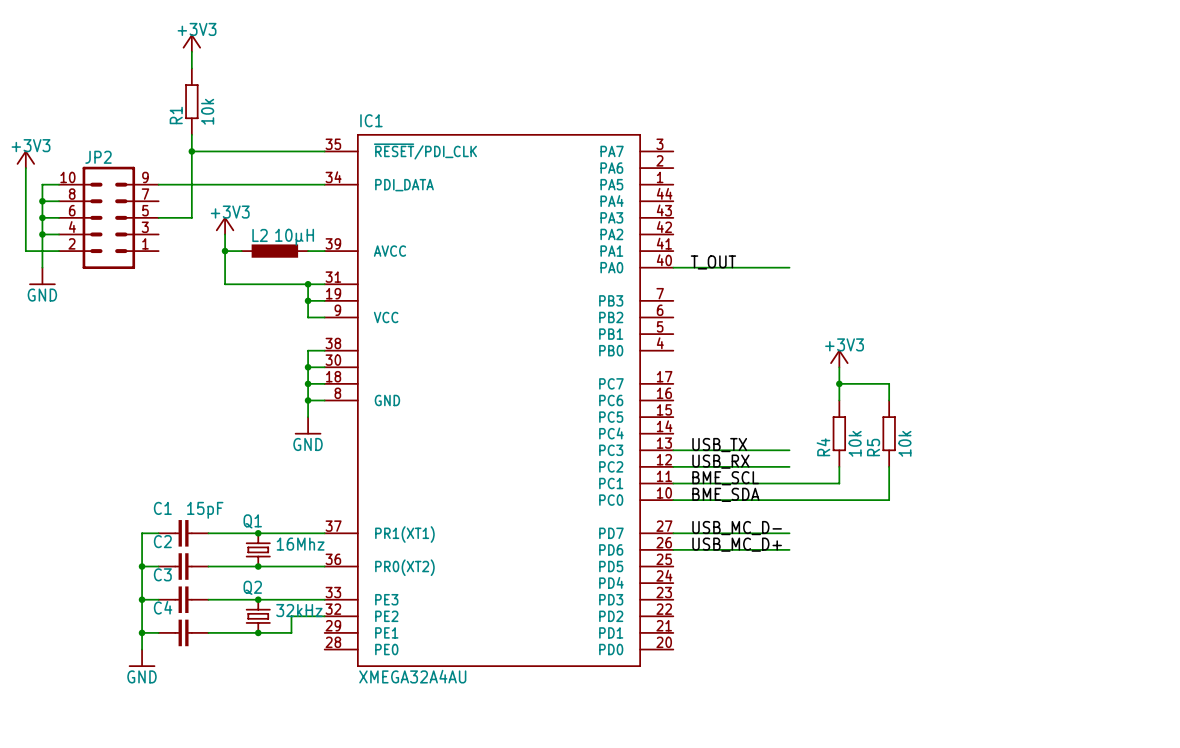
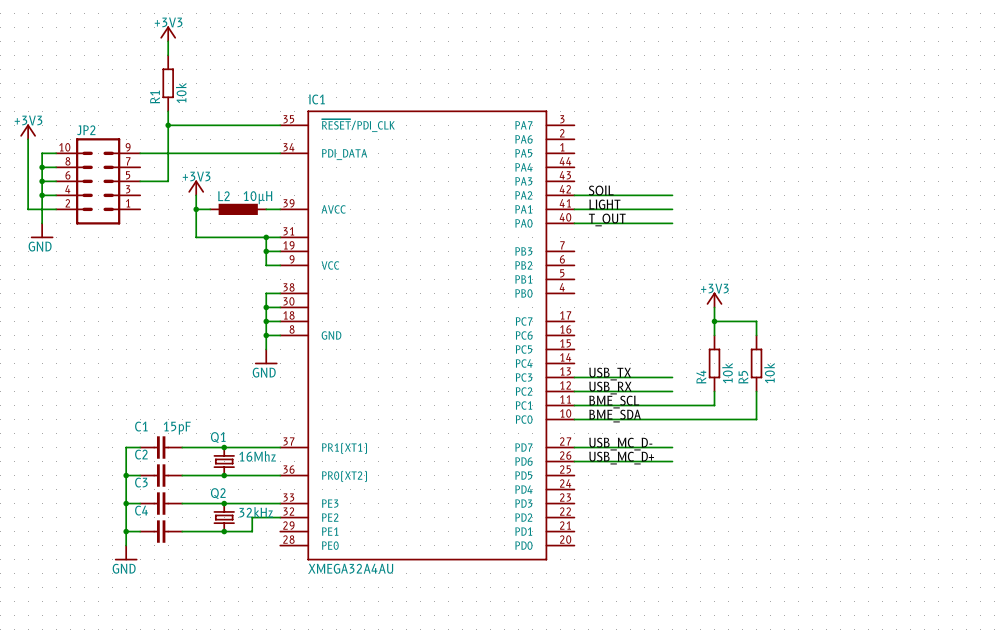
label: none -> SOIL (601, 190)
wire: none -> (574, 195) (672, 195)
label: none -> LIGHT (604, 204)
wire: none -> (574, 209) (672, 209)

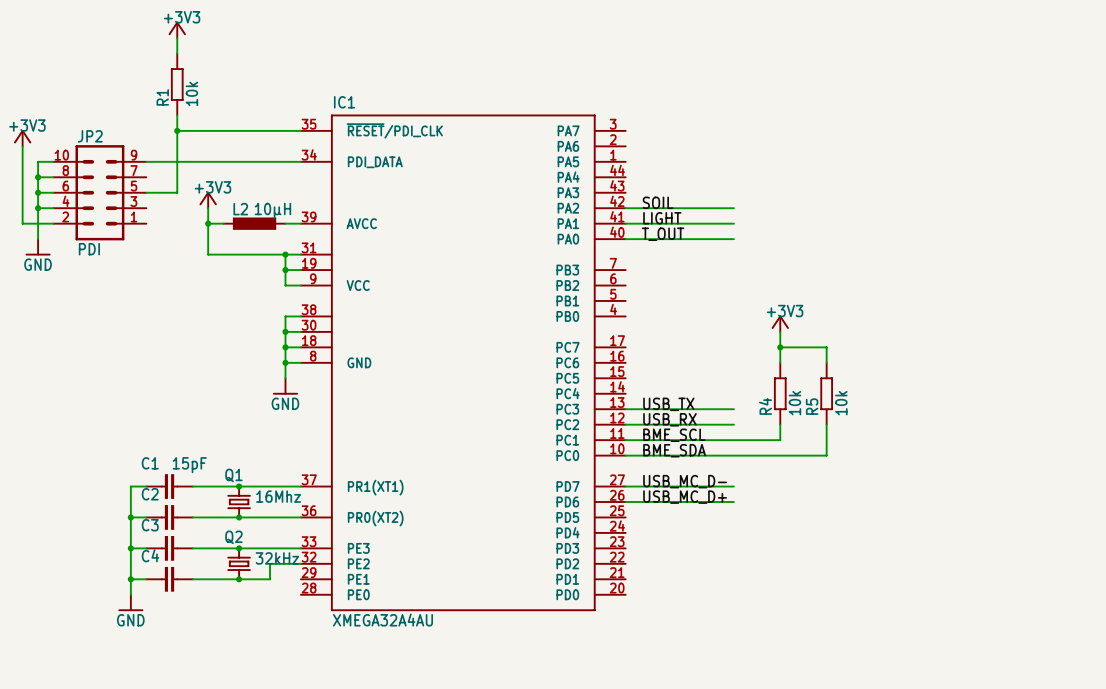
JP2 value: none -> PDI (89, 249)

